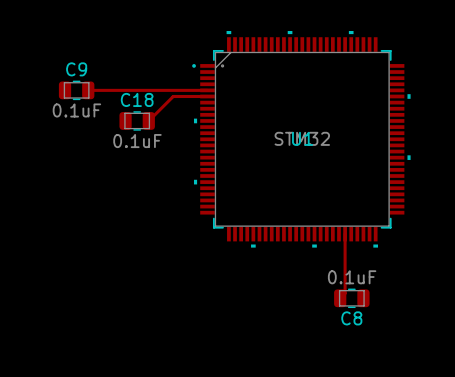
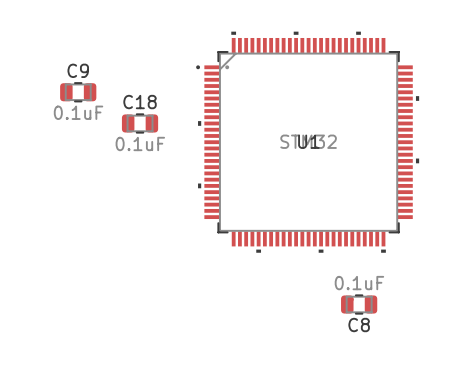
track: (88, 90) (207, 90) -> none
track: (207, 96) (173, 96) (148, 120) -> none
track: (345, 234) (345, 293) -> none

